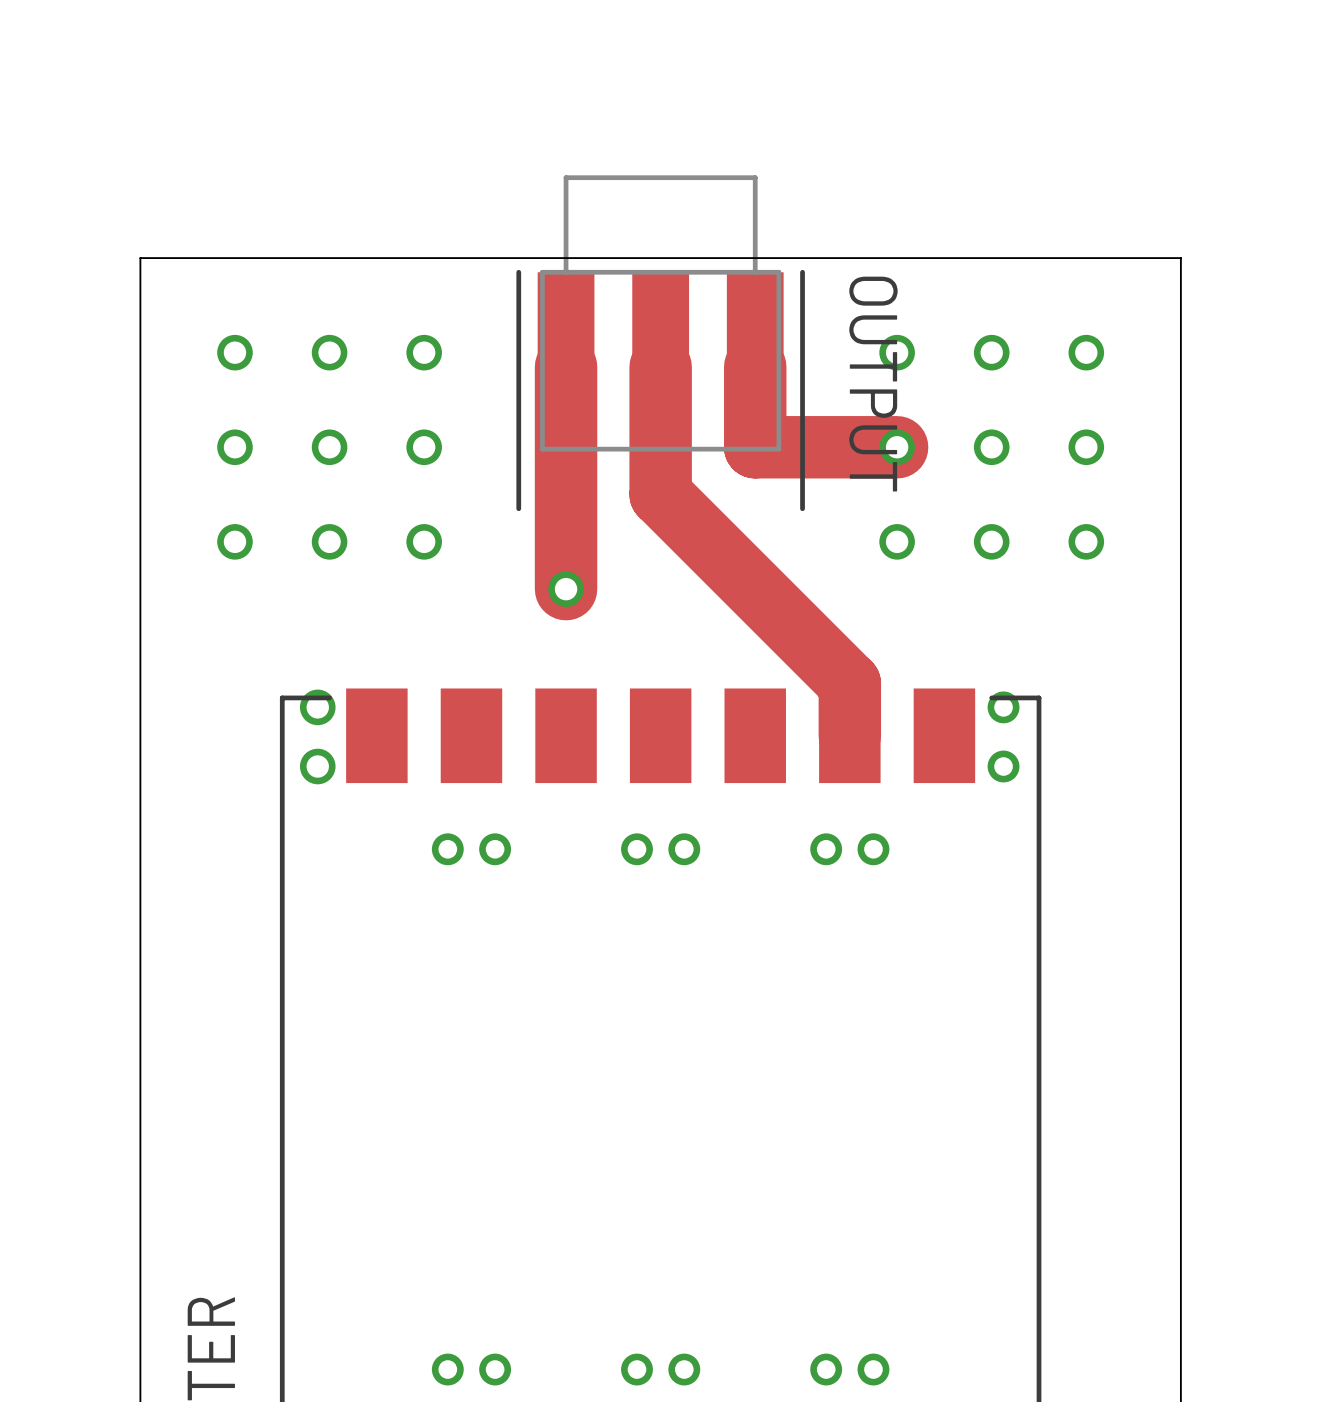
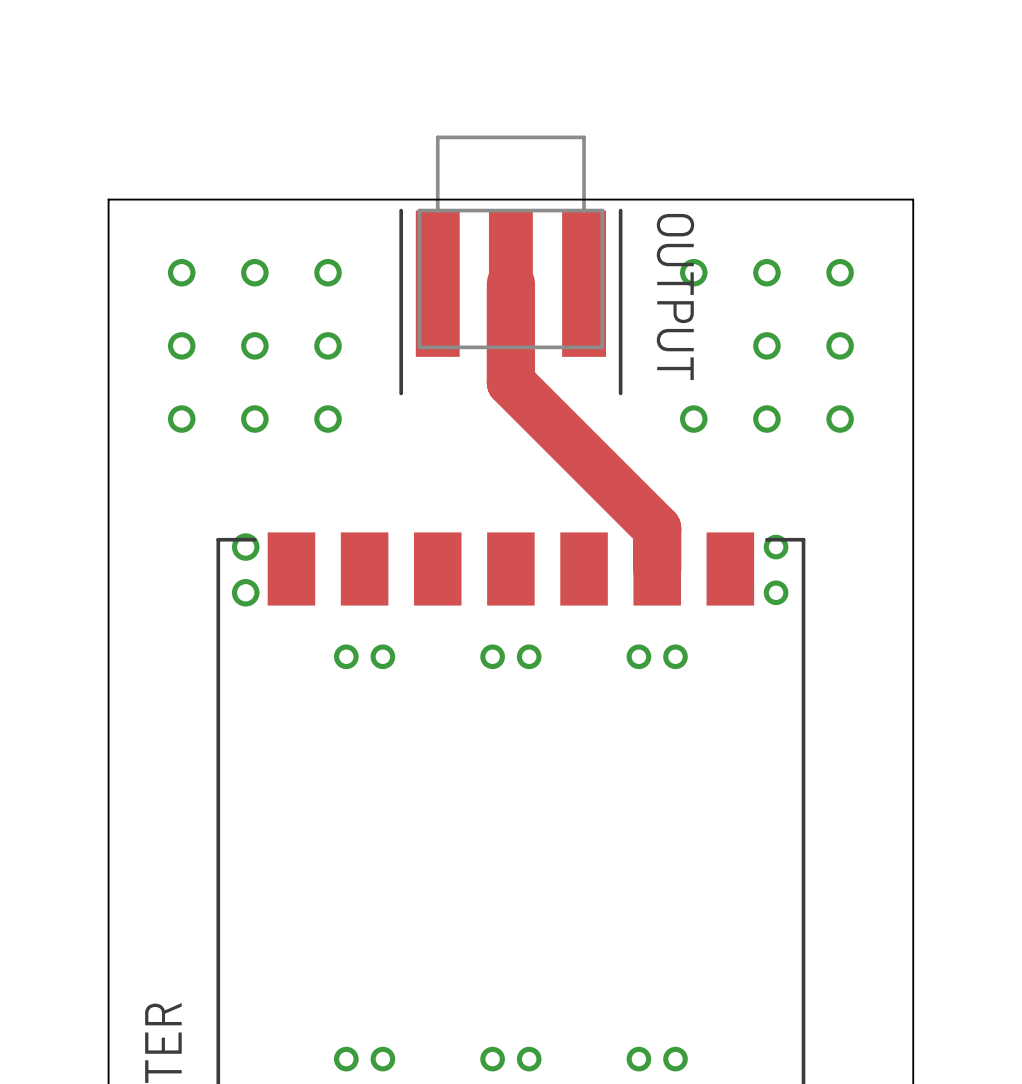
track: (566, 366) (566, 589) -> none
track: (755, 366) (755, 447) (897, 447) -> none
via: (897, 447) -> none
via: (566, 589) -> none

